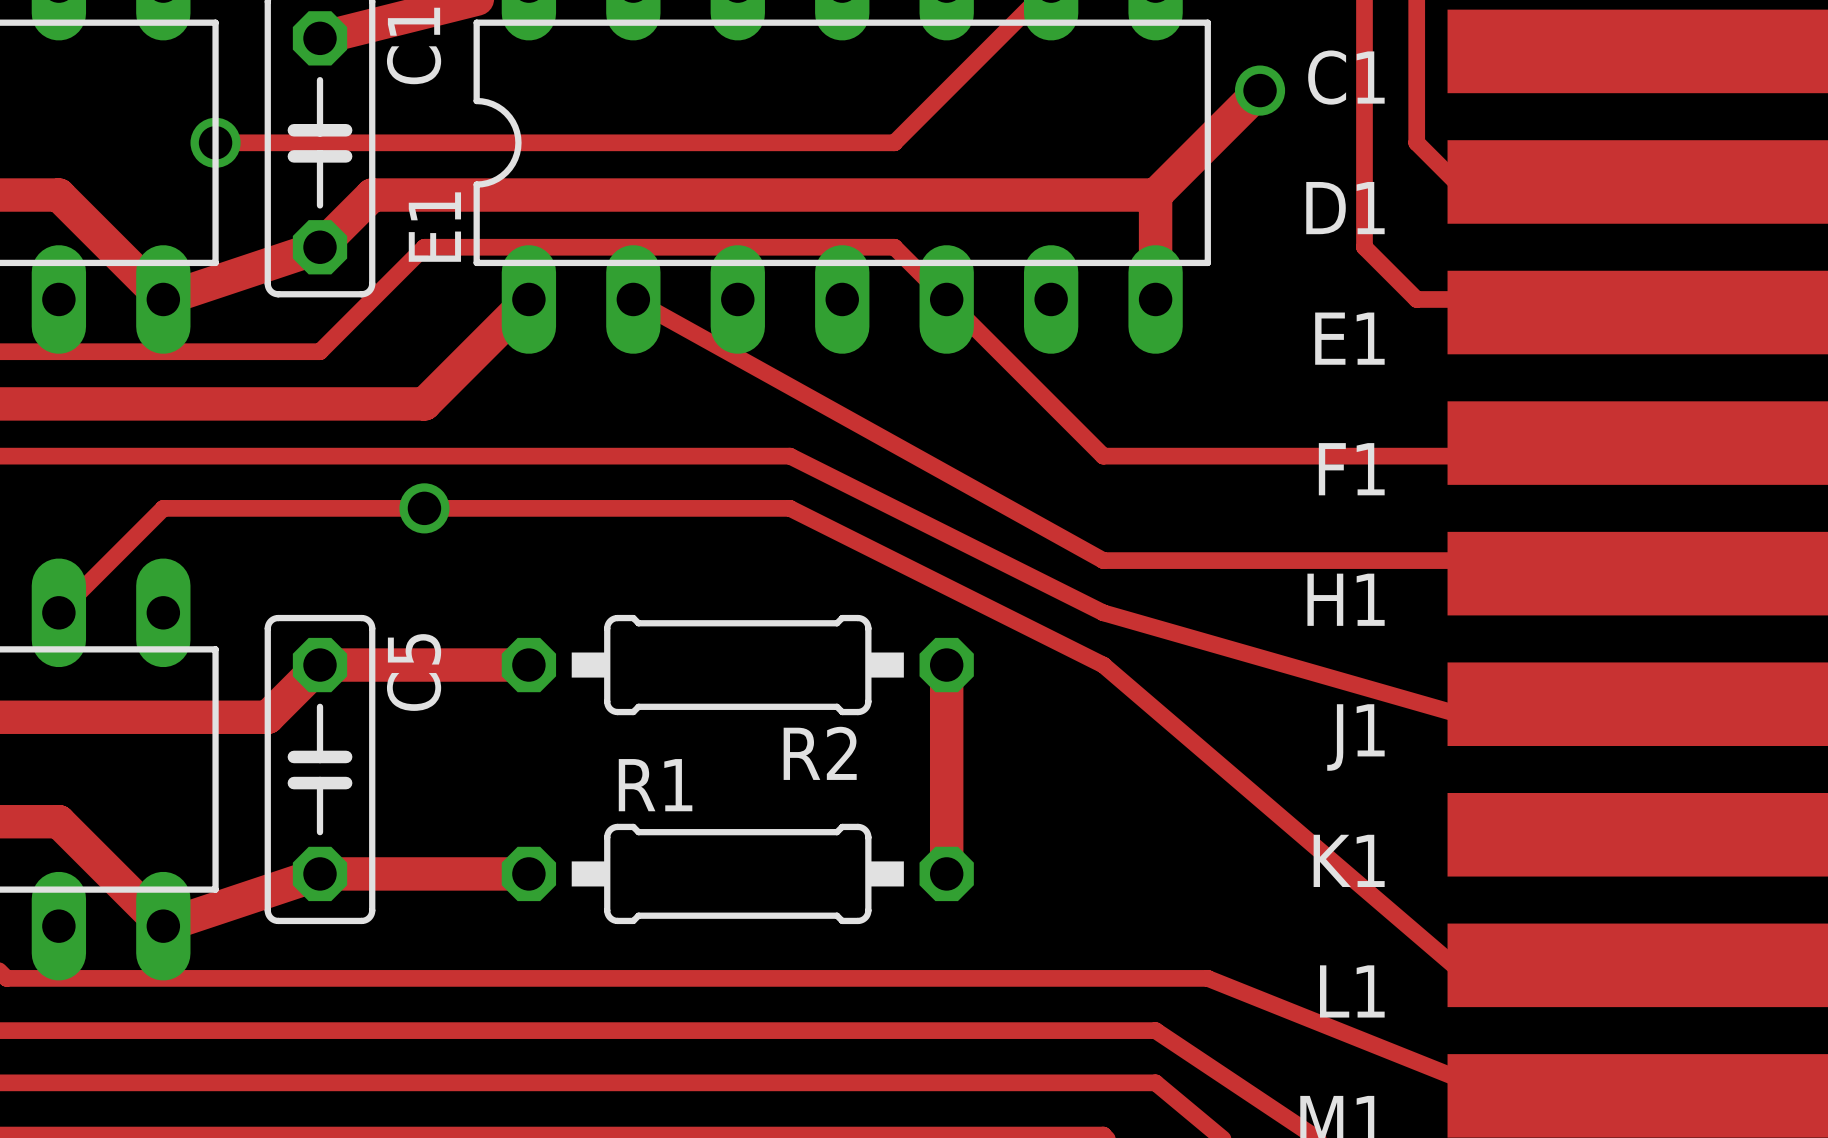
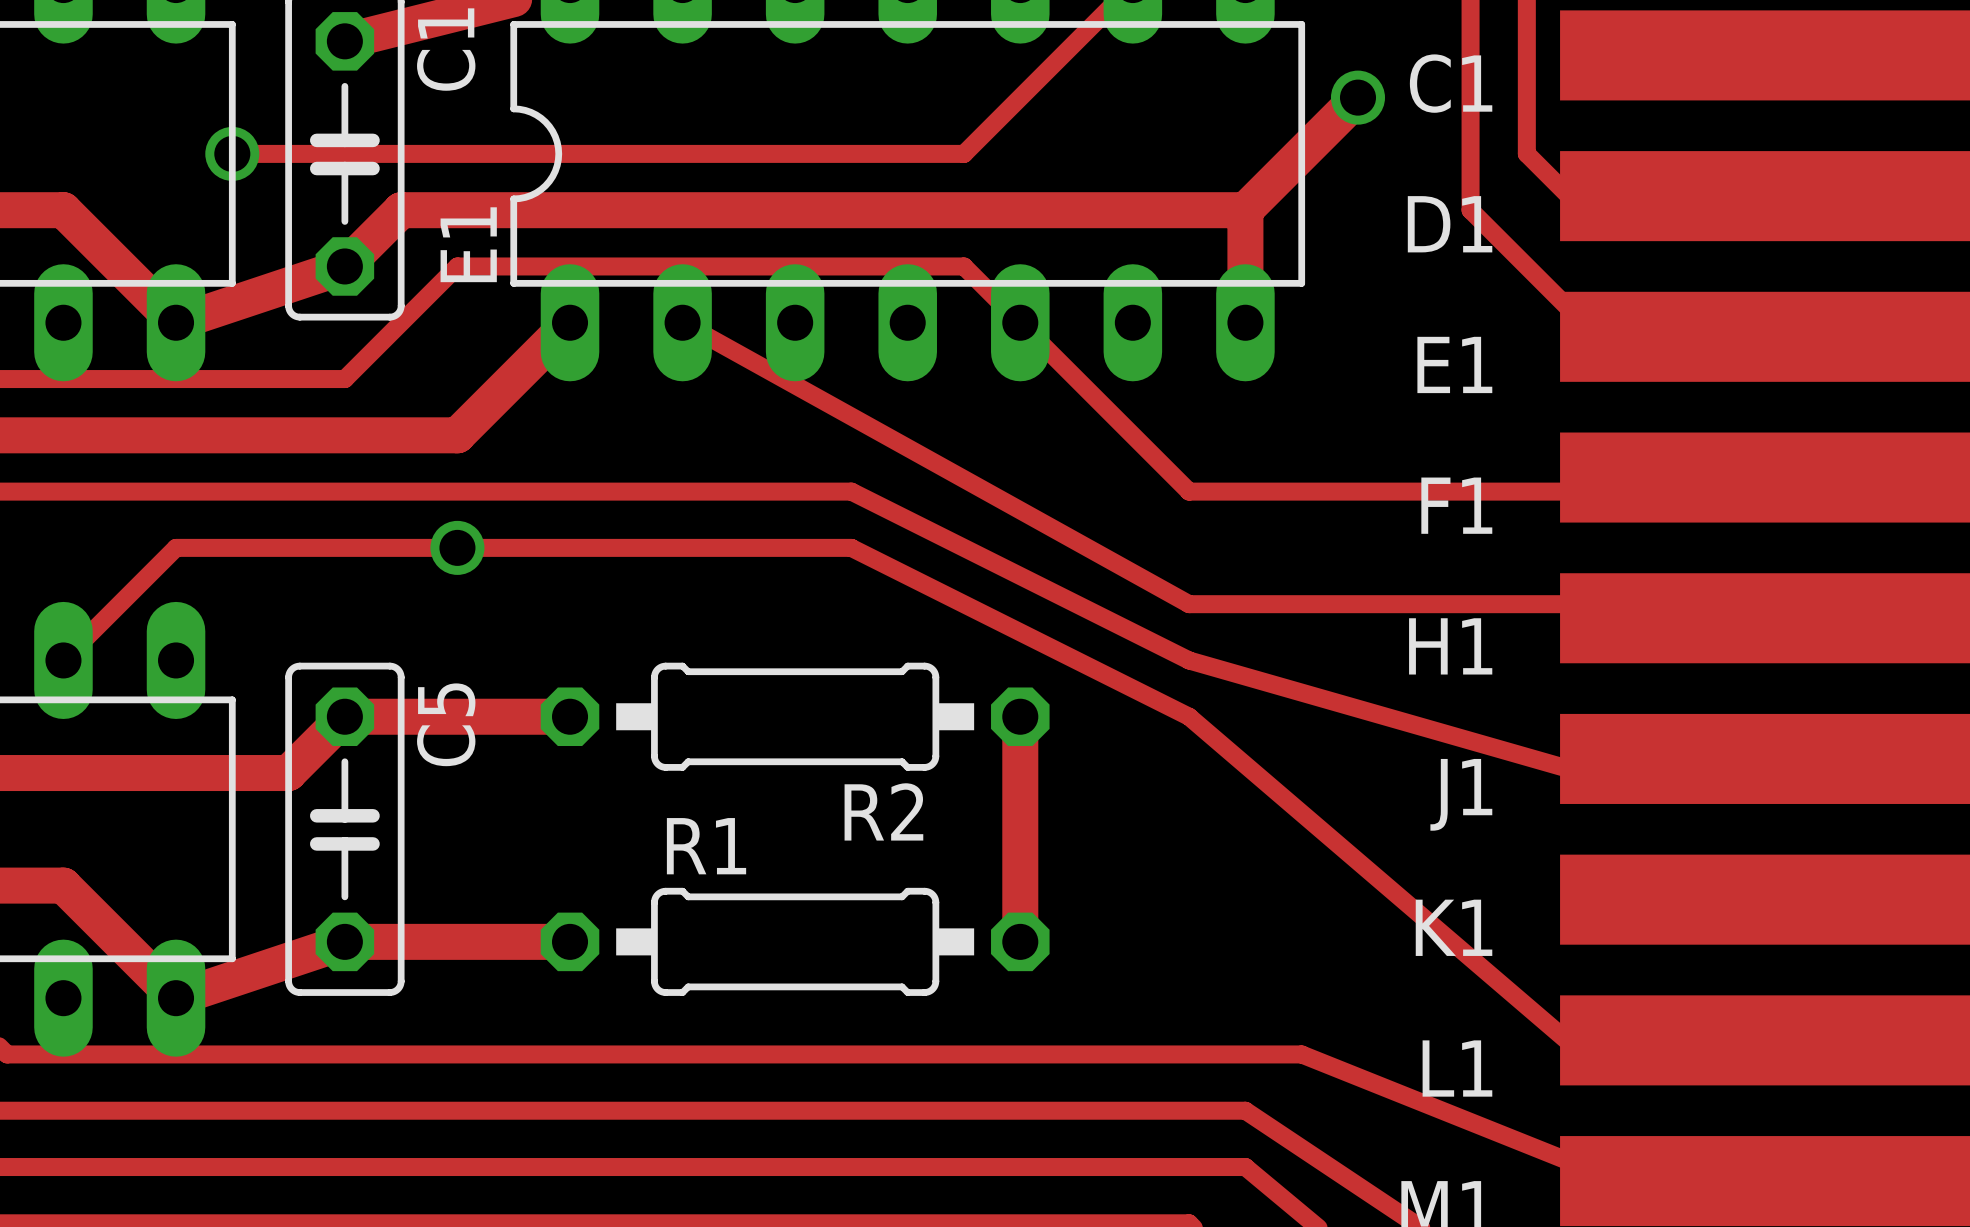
track: (1364, 195) (1364, 247) (1416, 299) (1468, 299) -> (1470, 210) (1583, 322)

